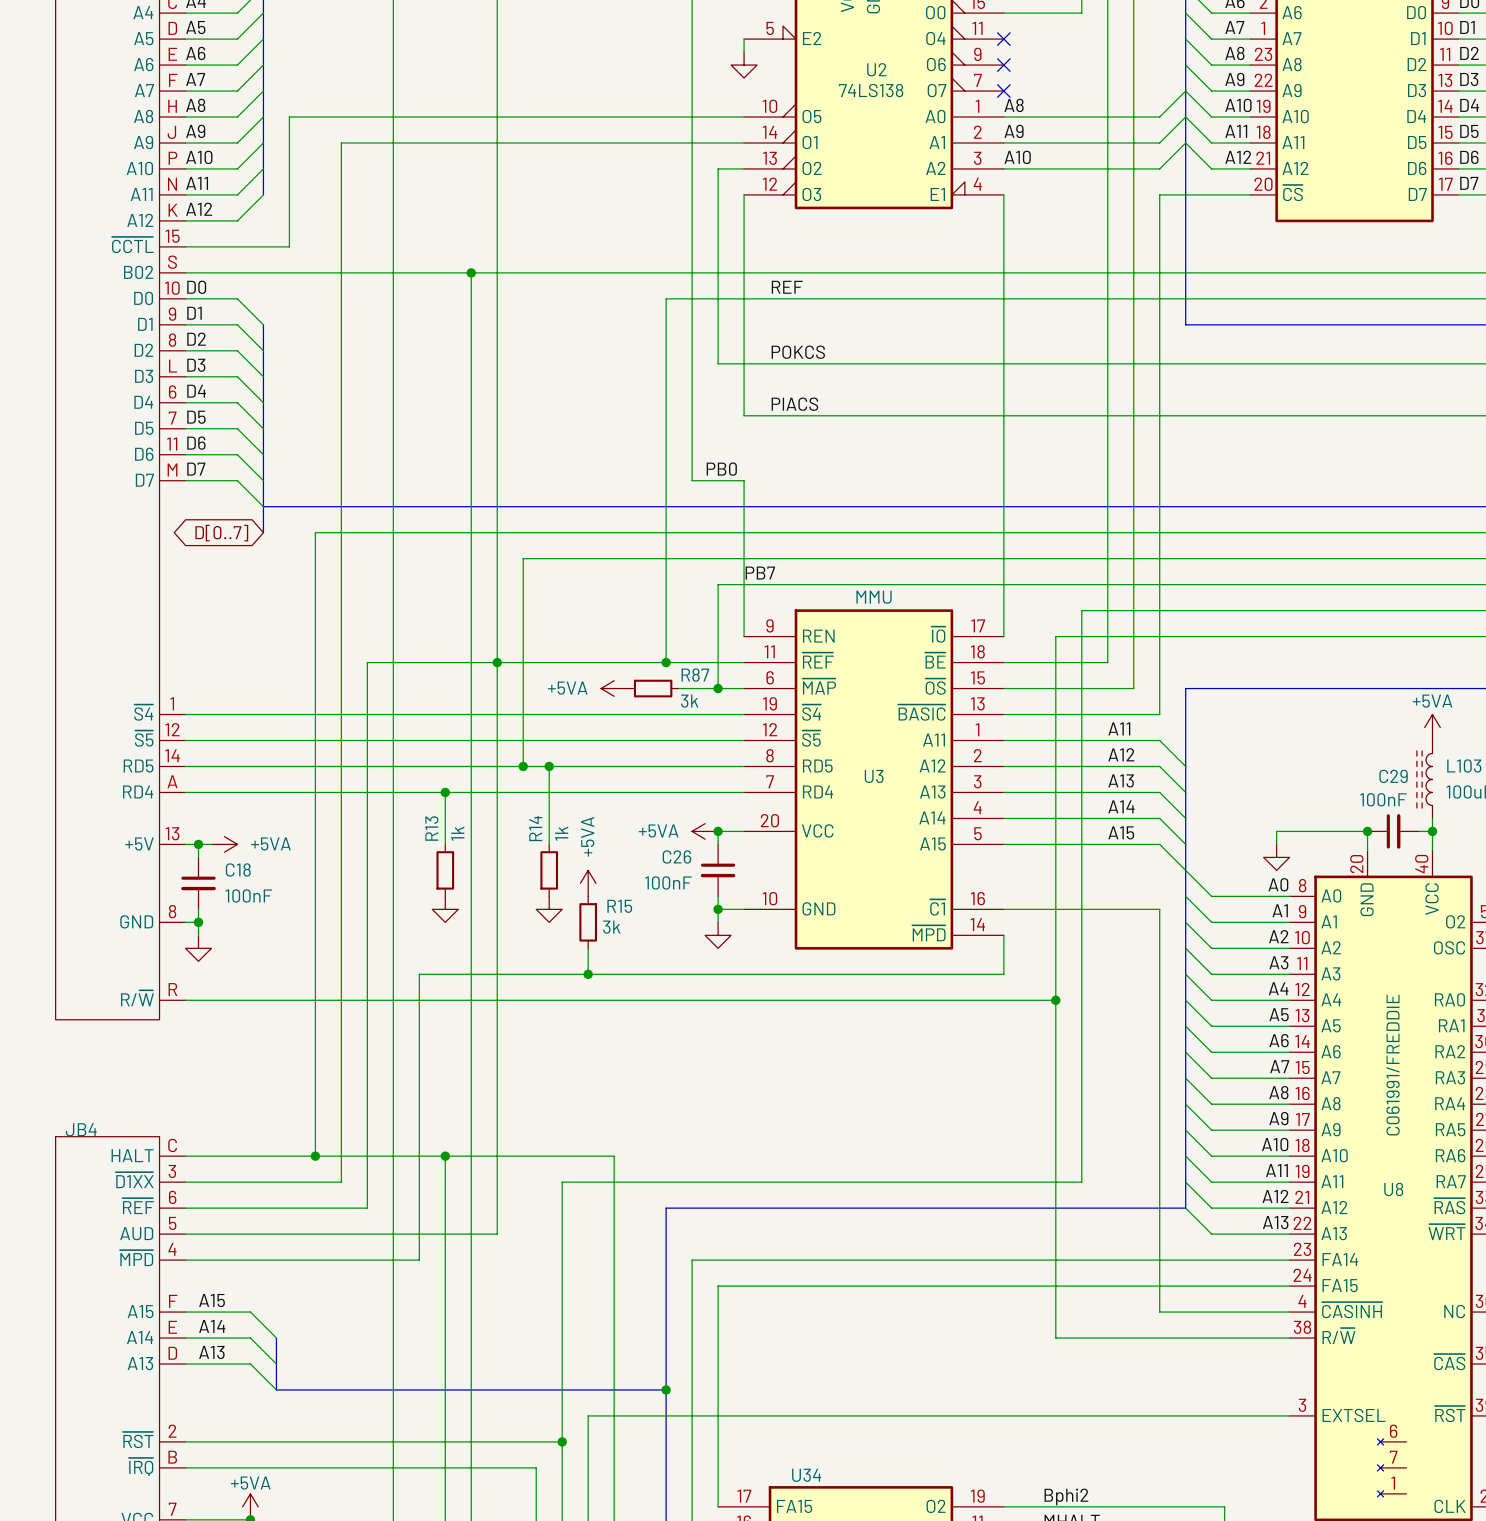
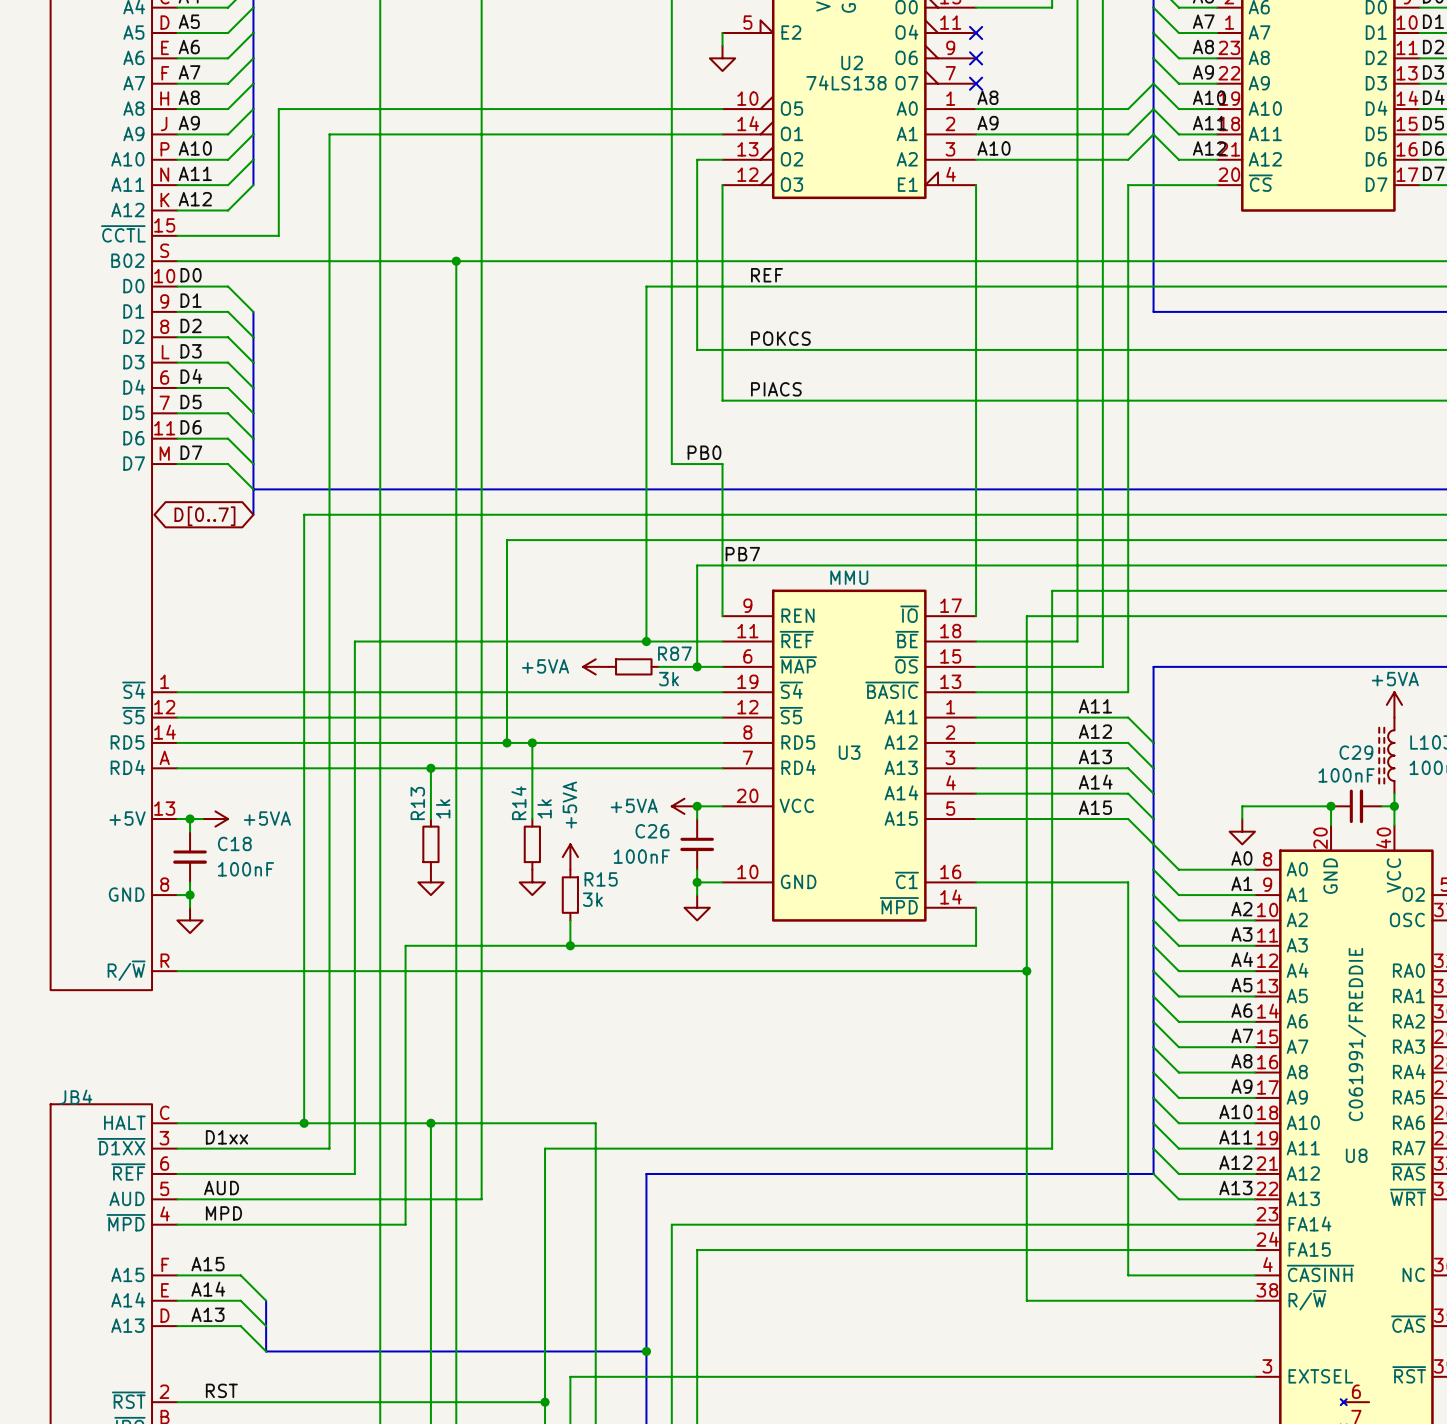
junction: (497, 662) -> none
label: none -> D1xx (226, 1137)
label: none -> AUD (221, 1188)
label: none -> MPD (223, 1213)
label: none -> RST (221, 1390)

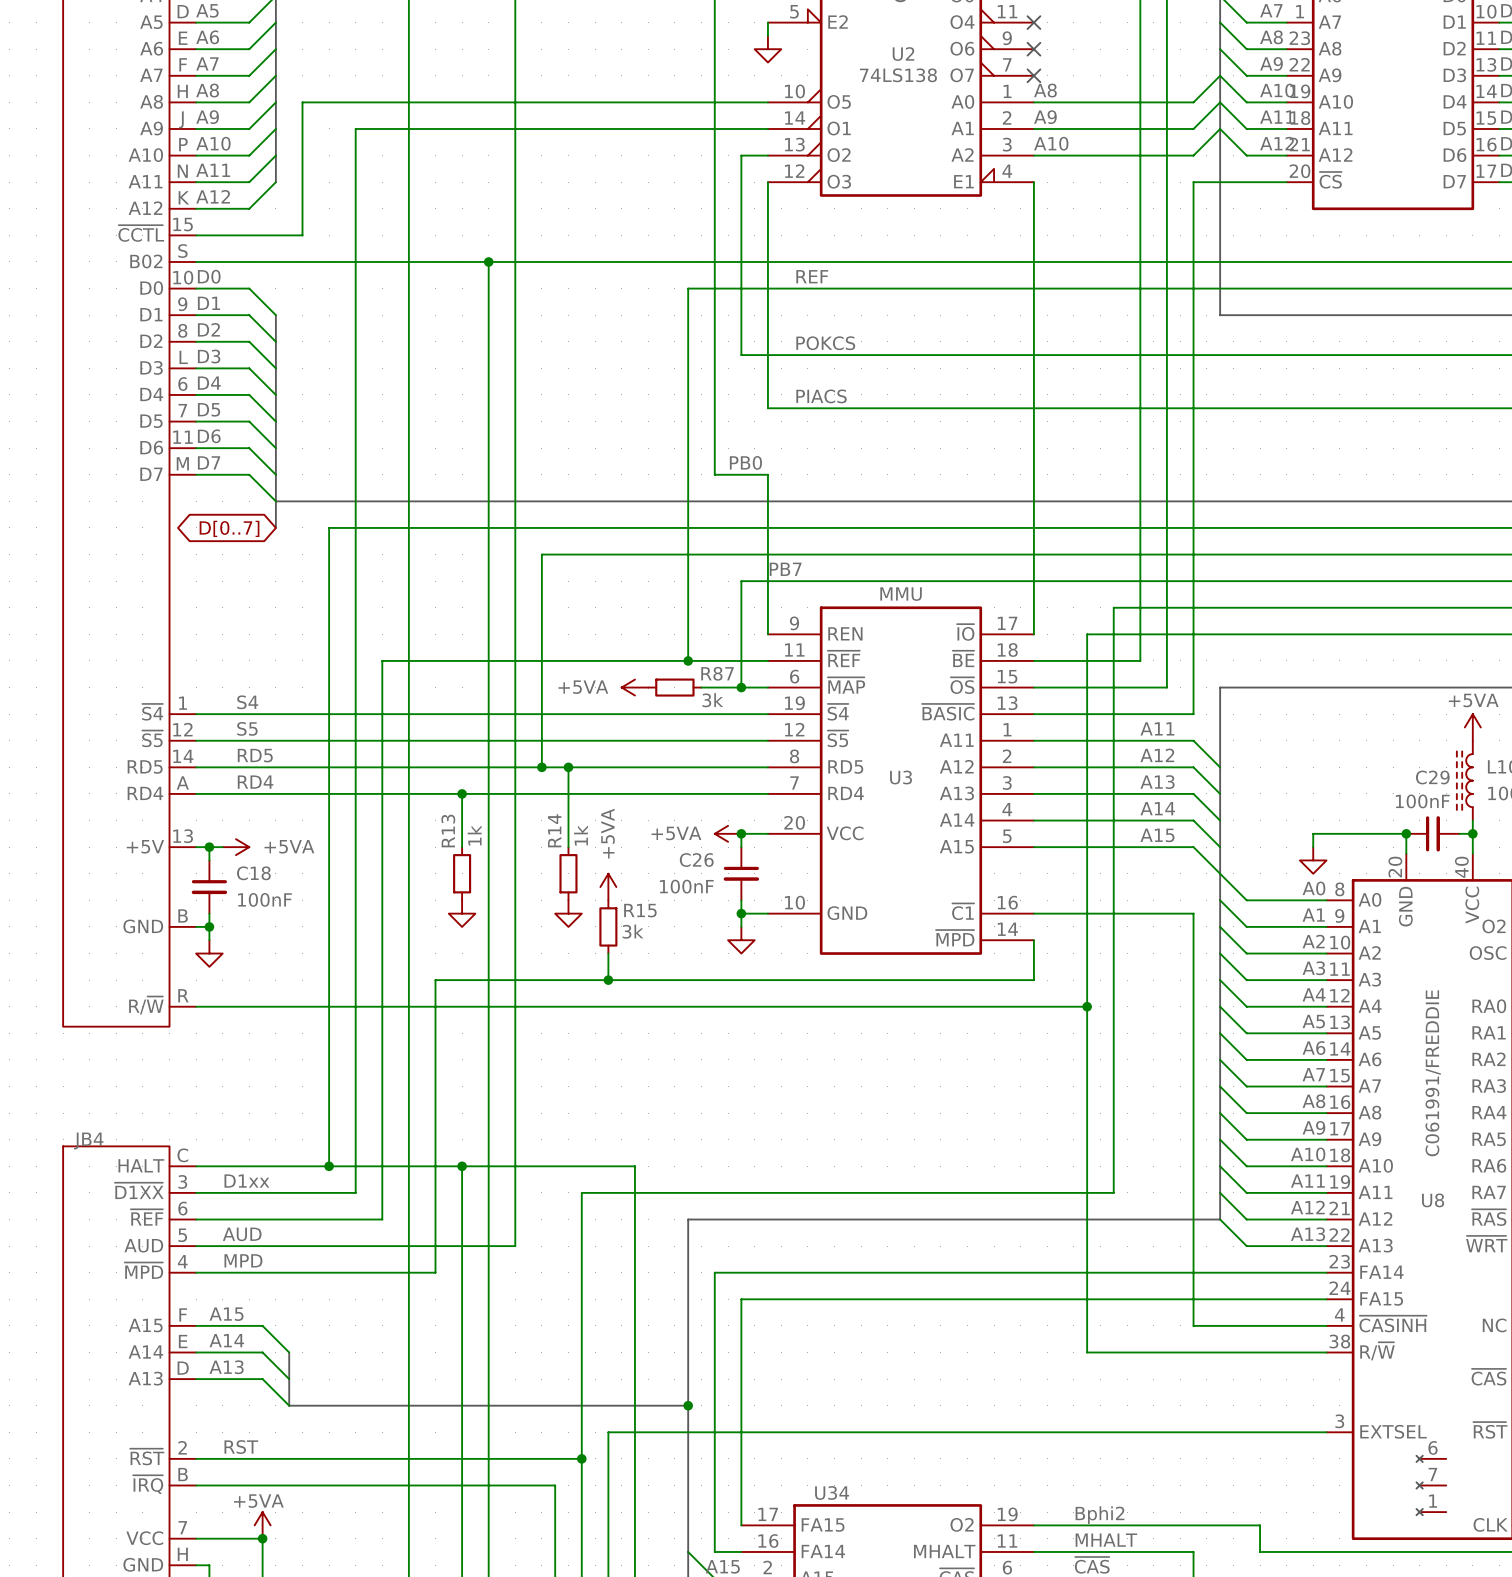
label: none -> S4 (247, 702)
label: none -> S5 (247, 728)
label: none -> RD5 (255, 755)
label: none -> RD4 (255, 782)
part pin number: 8 (164, 884) -> B (183, 915)

